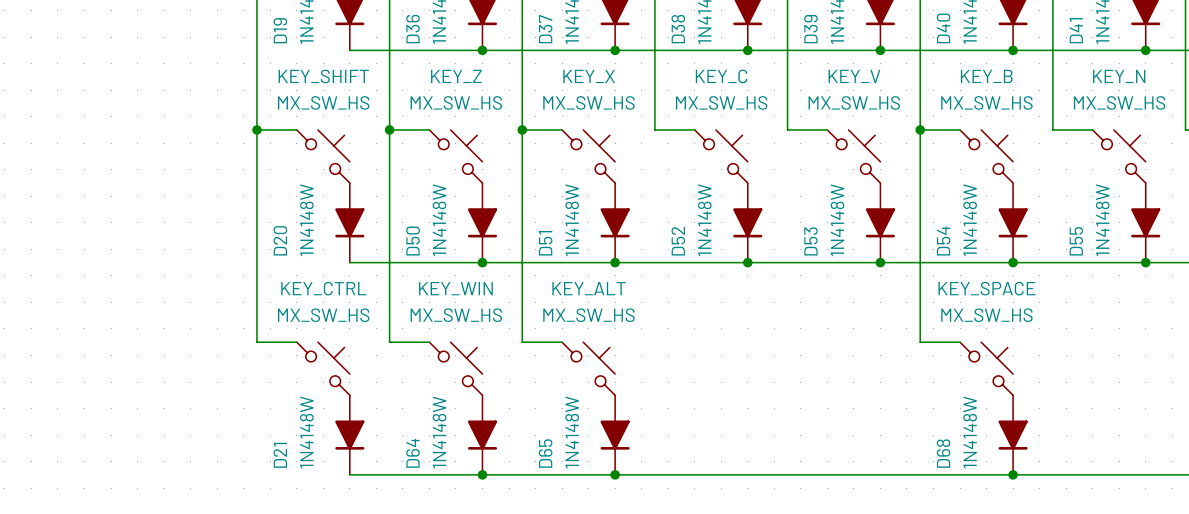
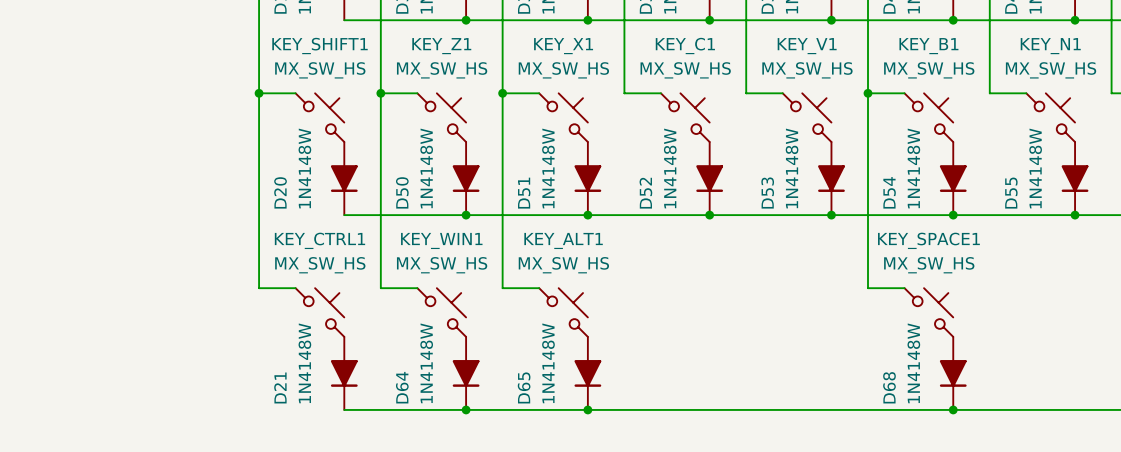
KEY_SHIFT name: KEY_SHIFT (323, 76) -> KEY_SHIFT1 (319, 46)
KEY_Z name: KEY_Z (456, 76) -> KEY_Z1 (441, 46)
KEY_X name: KEY_X (589, 76) -> KEY_X1 (563, 46)
KEY_C name: KEY_C (721, 76) -> KEY_C1 (685, 46)
KEY_V name: KEY_V (854, 76) -> KEY_V1 (807, 46)
KEY_B name: KEY_B (986, 76) -> KEY_B1 (928, 46)
KEY_N name: KEY_N (1119, 76) -> KEY_N1 (1050, 46)
KEY_CTRL name: KEY_CTRL (323, 288) -> KEY_CTRL1 (319, 240)
KEY_WIN name: KEY_WIN (455, 288) -> KEY_WIN1 (441, 240)
KEY_ALT name: KEY_ALT (589, 288) -> KEY_ALT1 (563, 240)
KEY_SPACE name: KEY_SPACE (986, 288) -> KEY_SPACE1 (928, 240)

